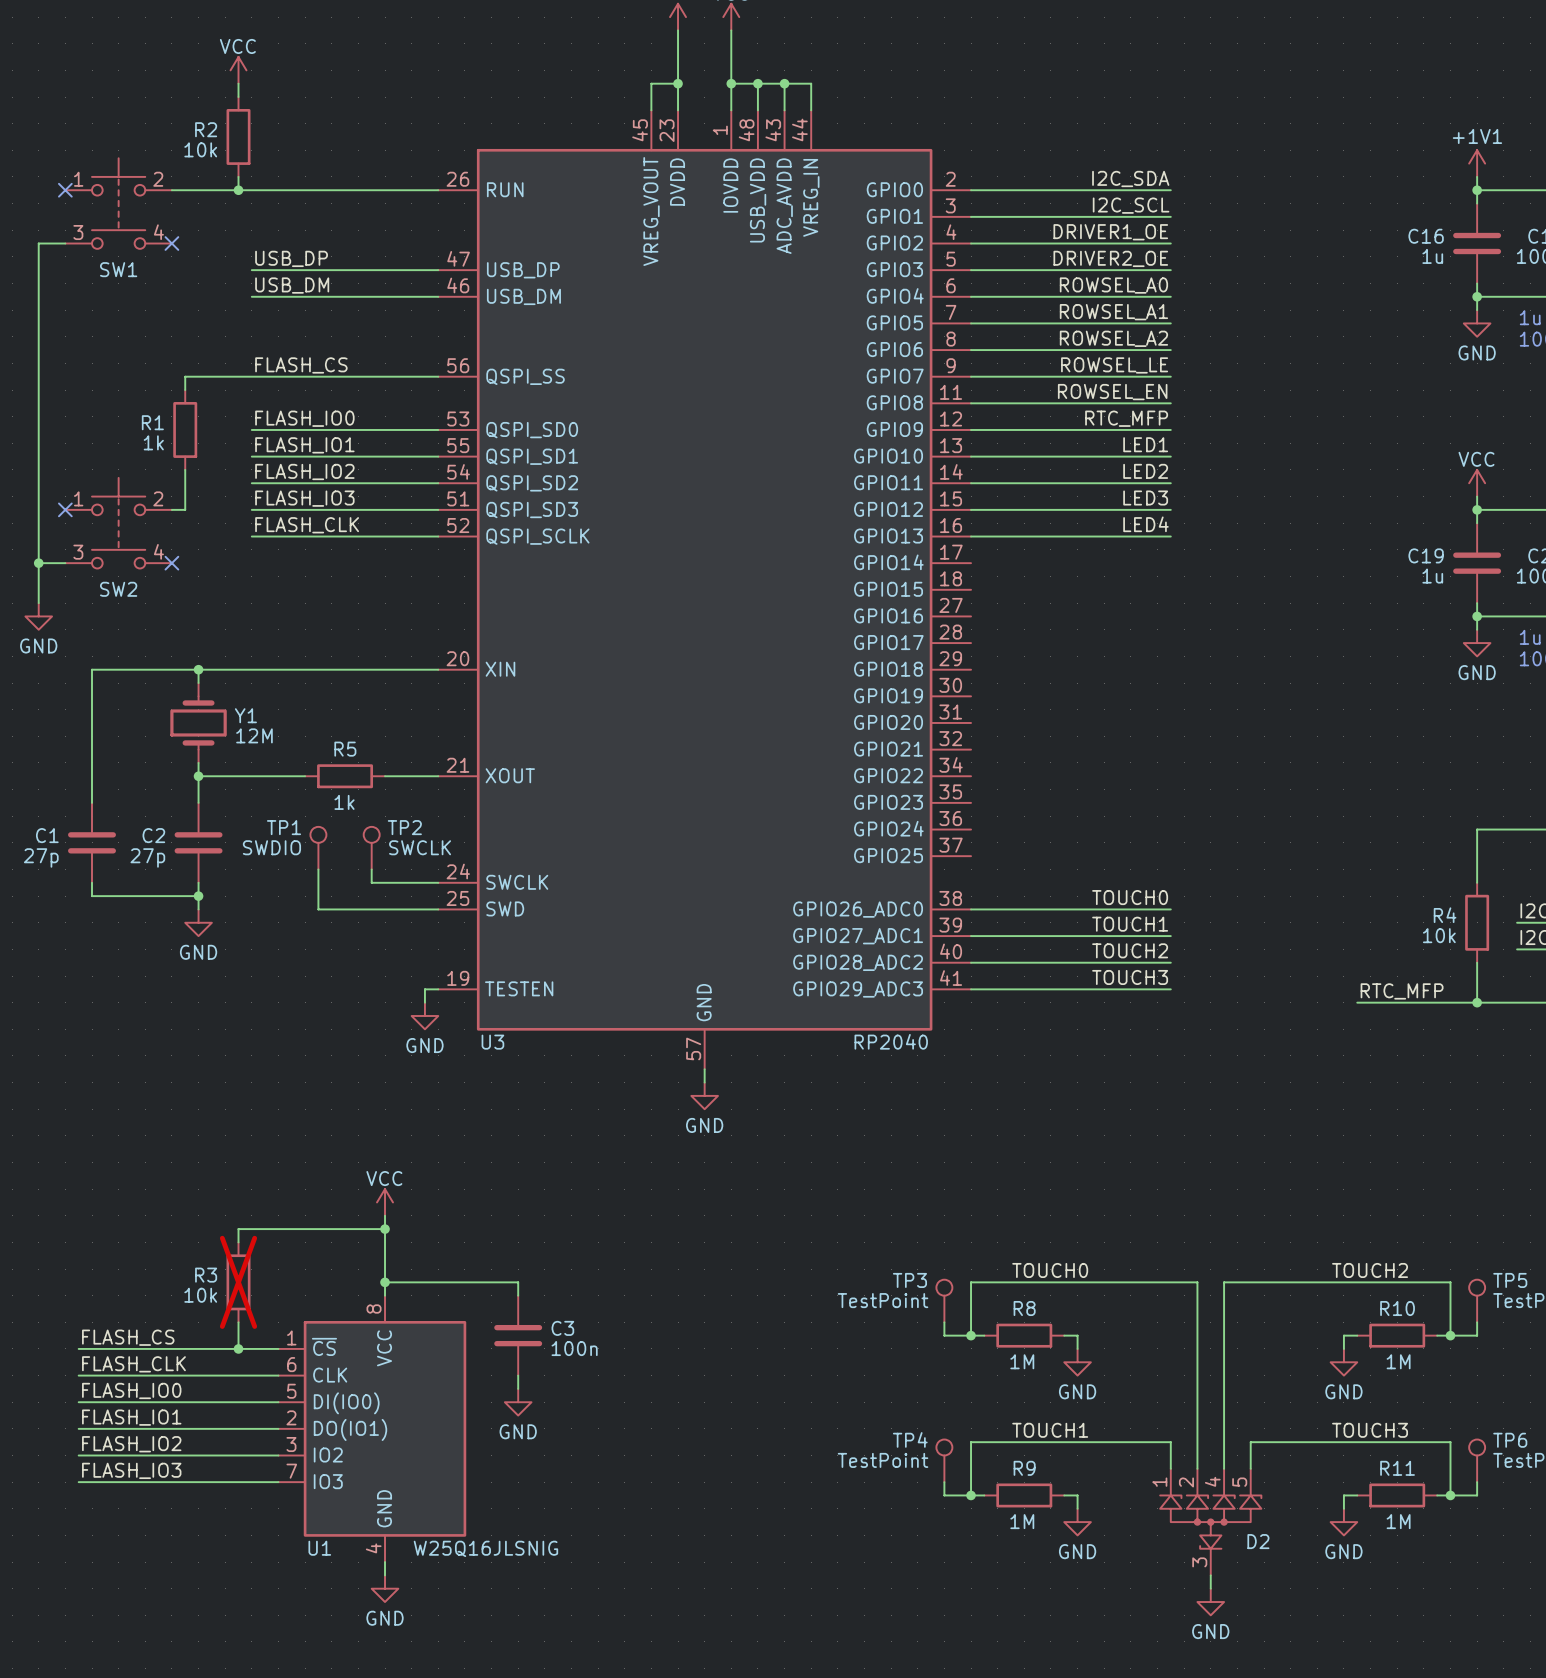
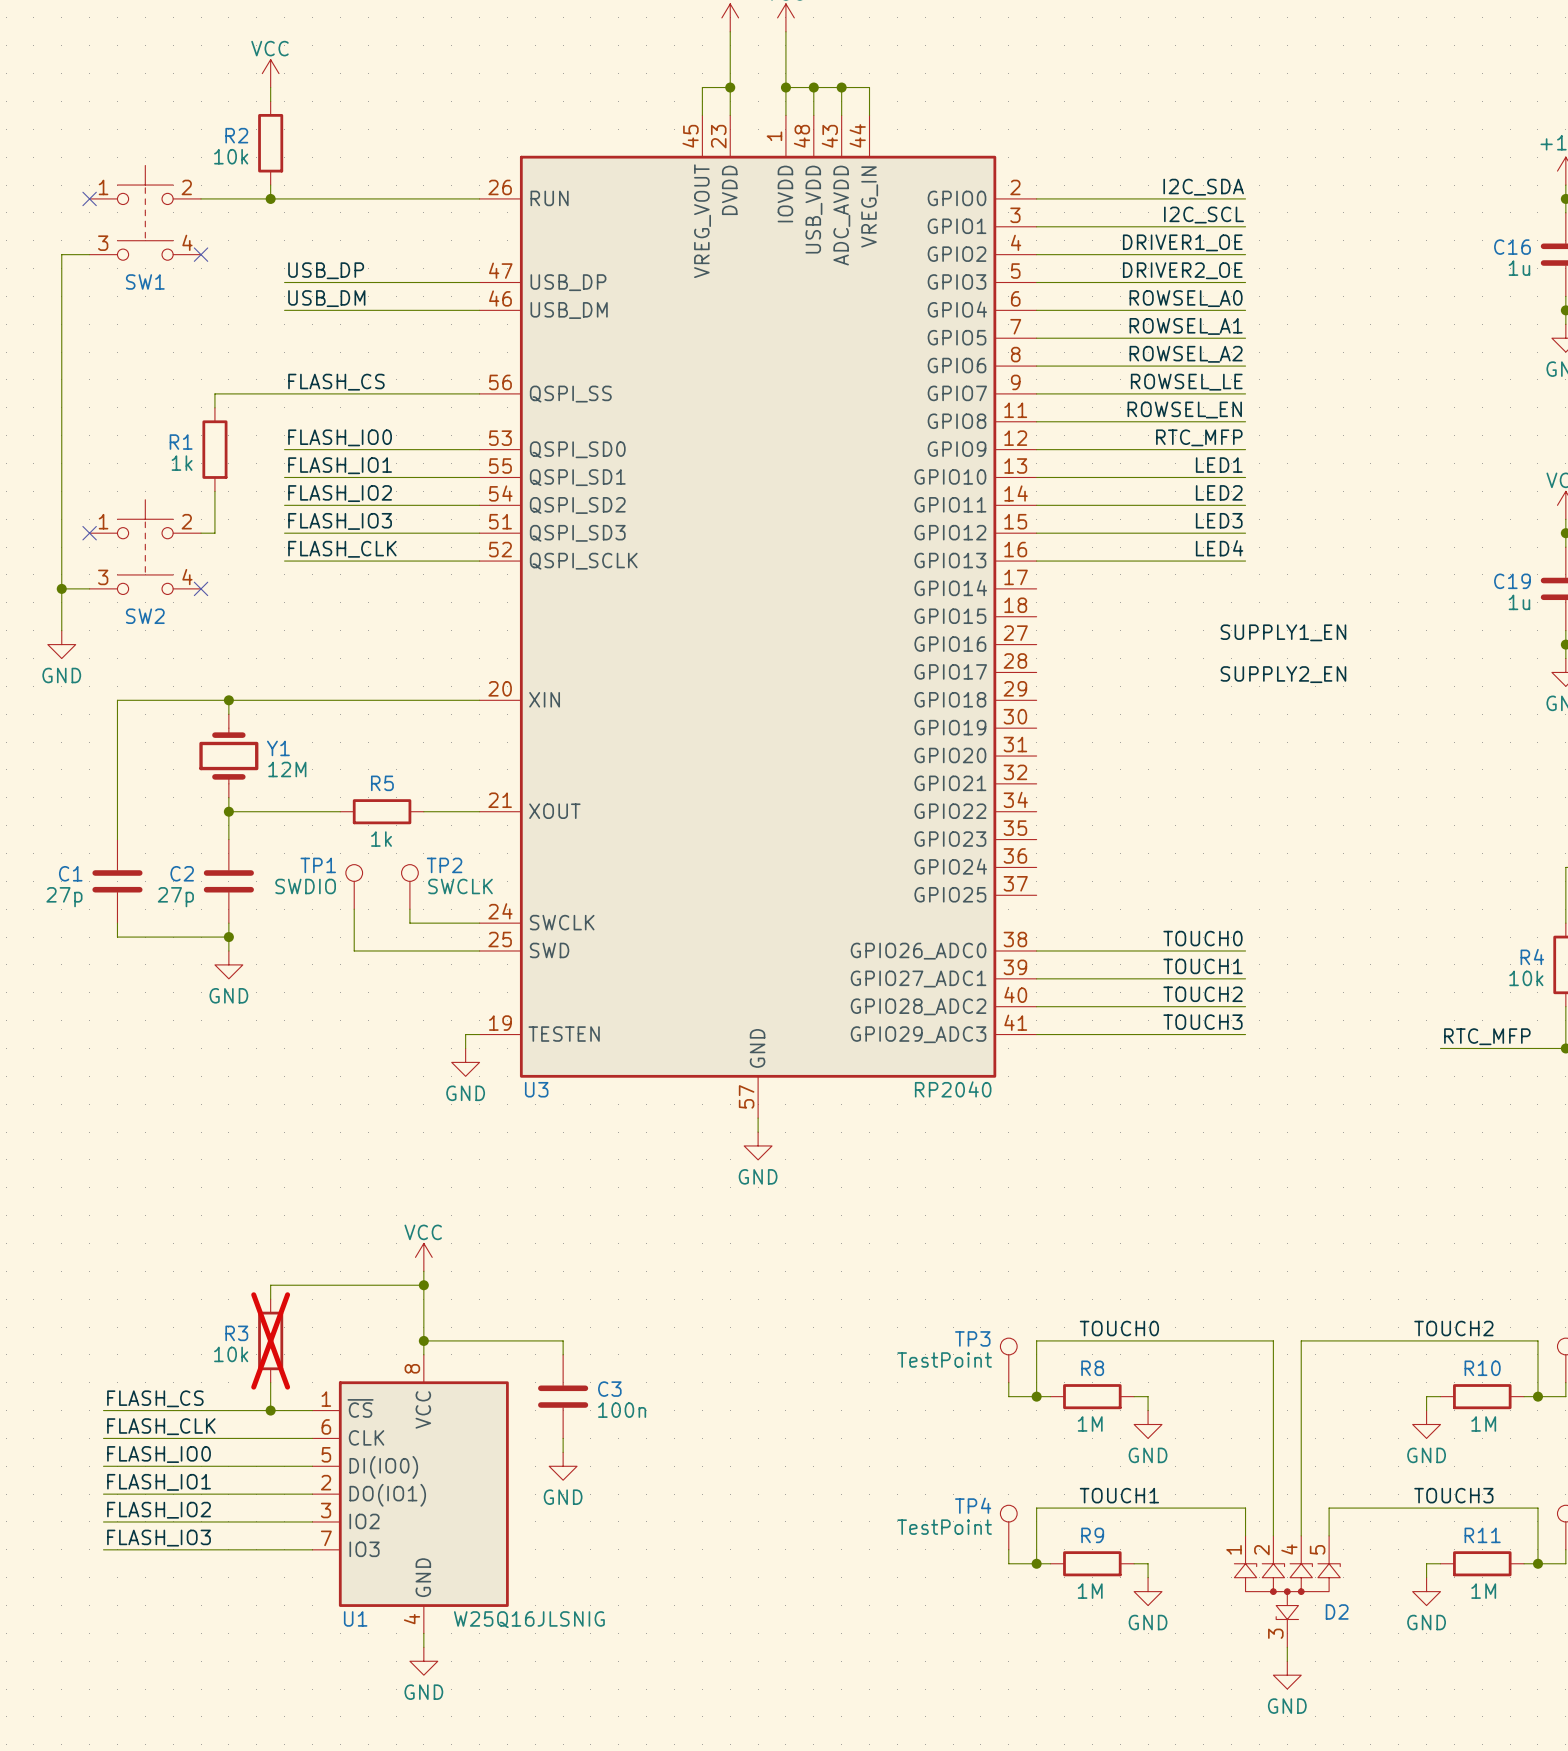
label: none -> SUPPLY1_EN (1283, 632)
label: none -> SUPPLY2_EN (1283, 674)

